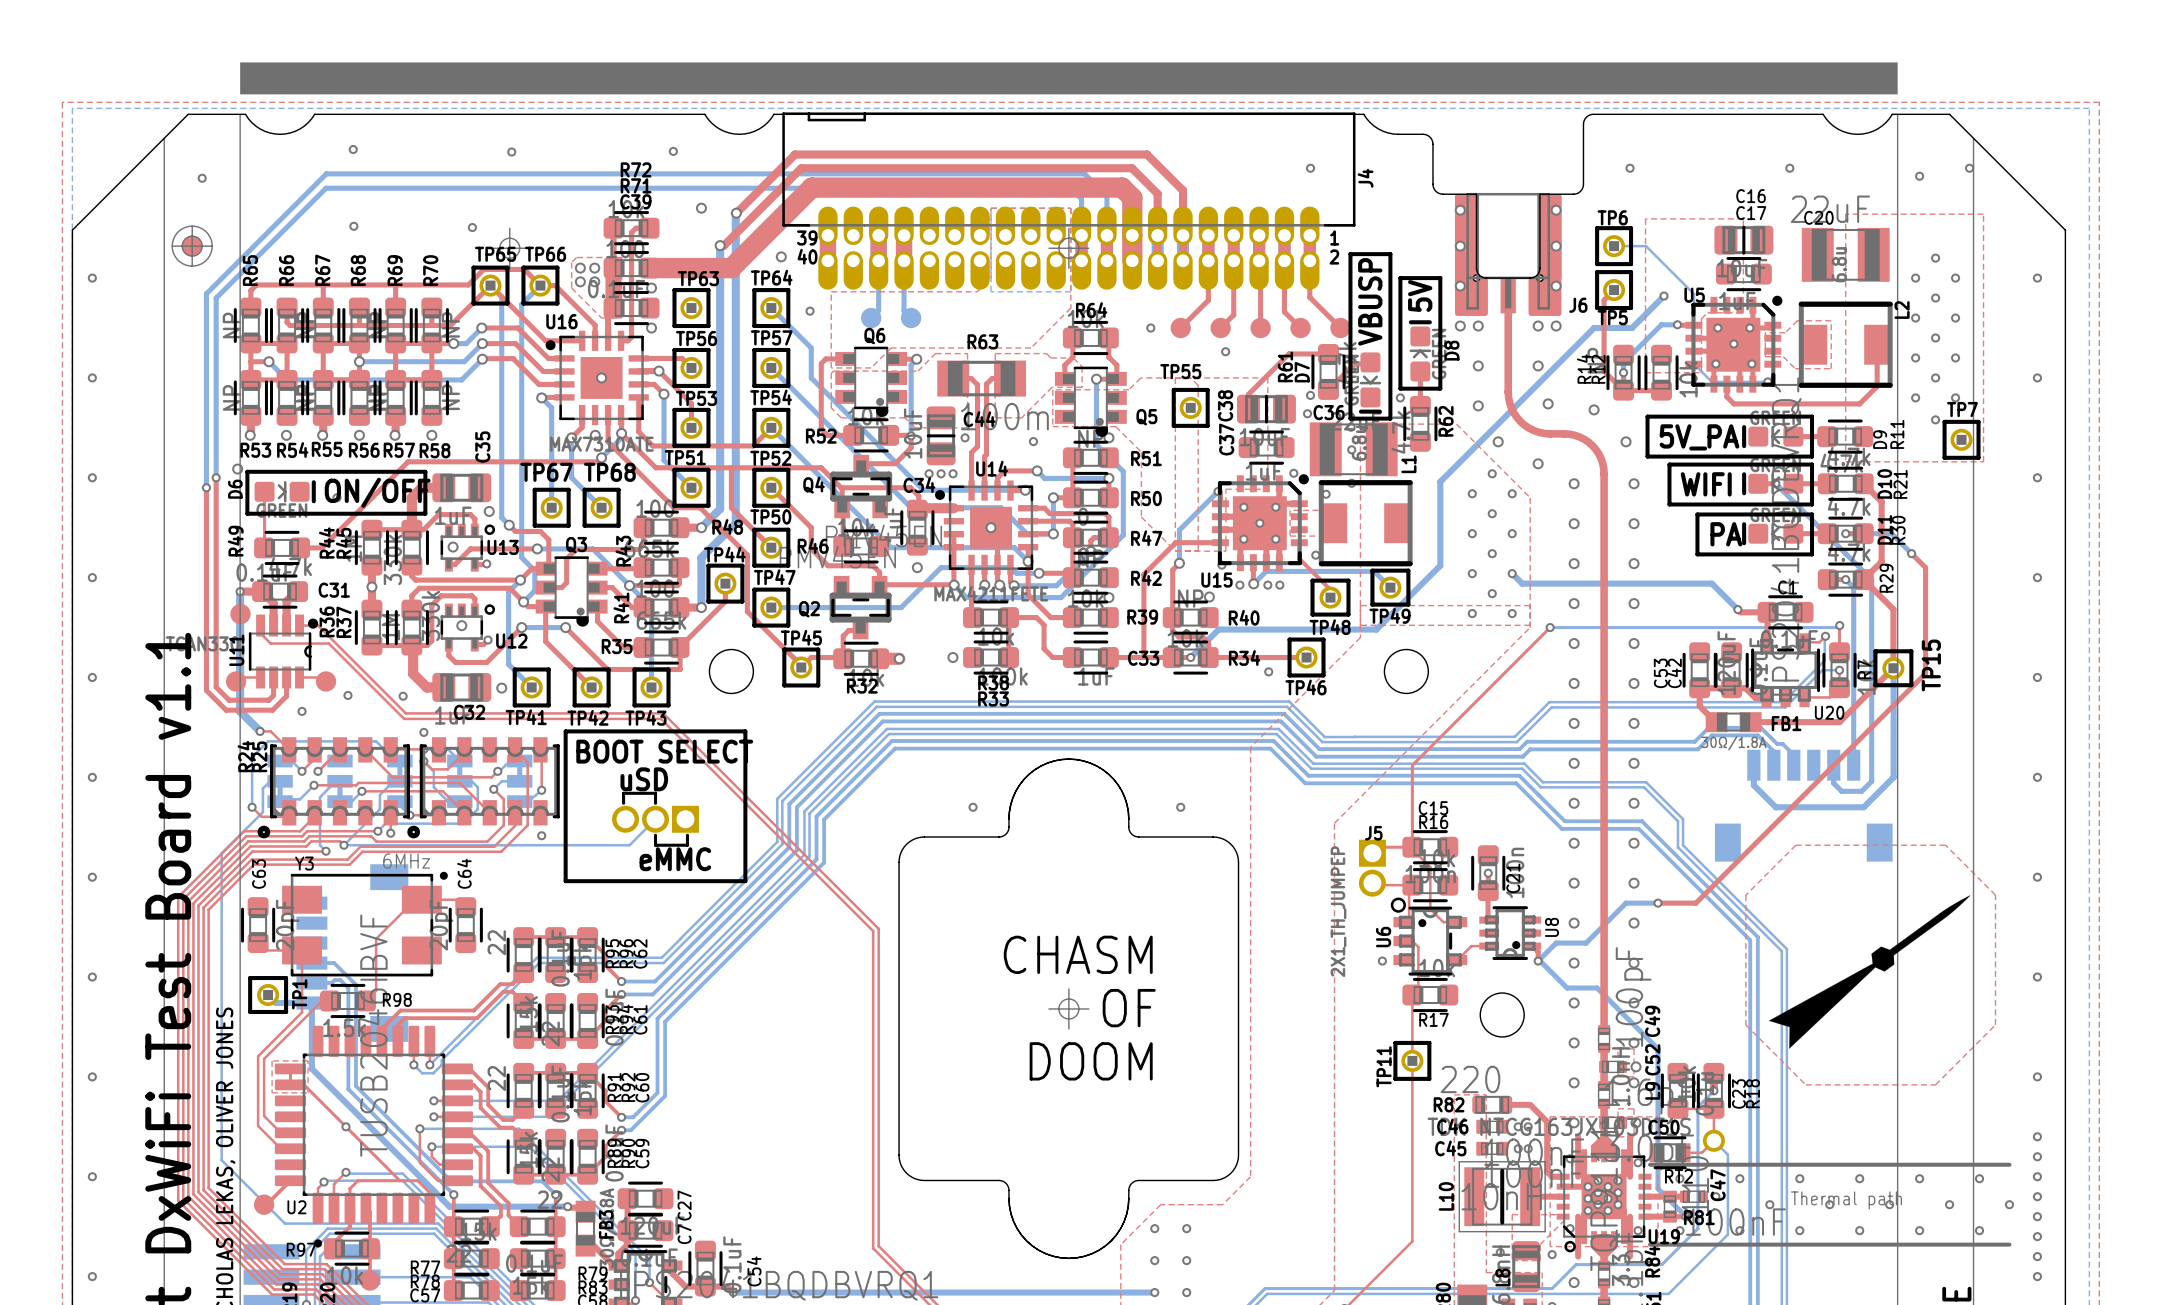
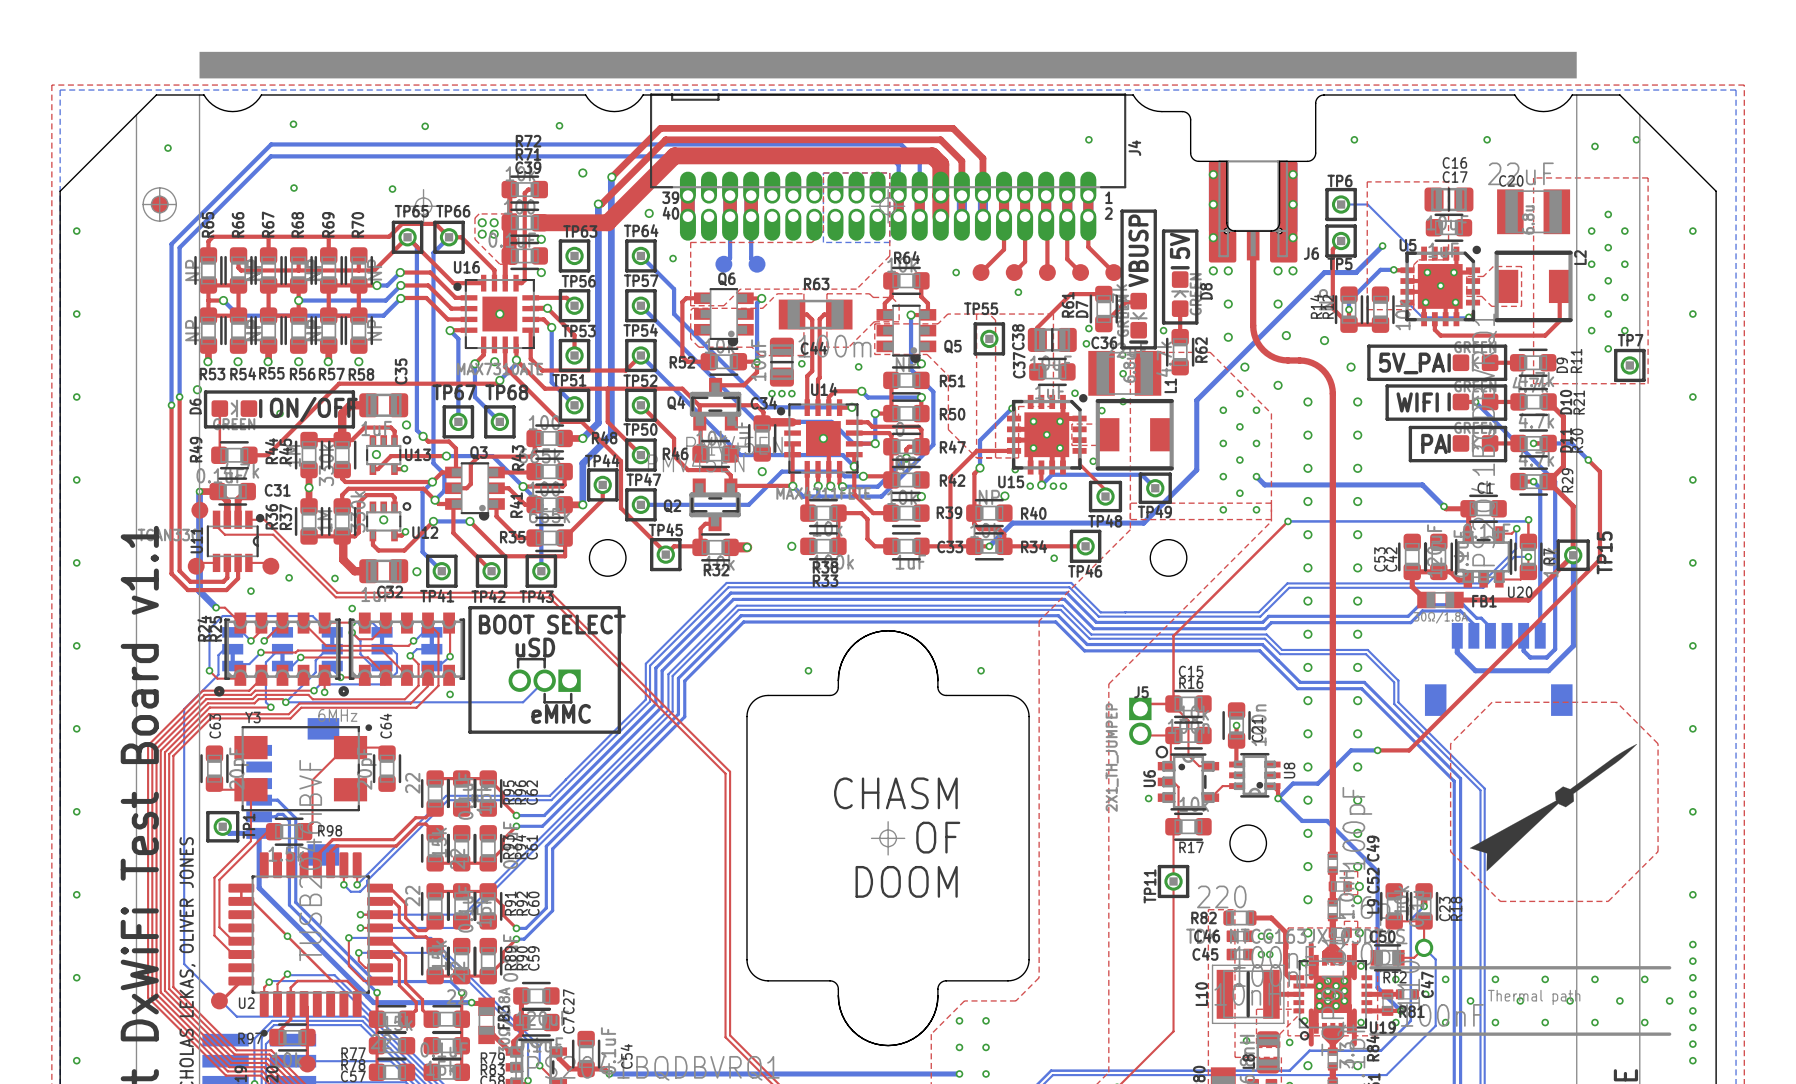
top zone outline: (272, 1060) (272, 1092) (308, 1092) (308, 1060) (272, 1060) -> none

